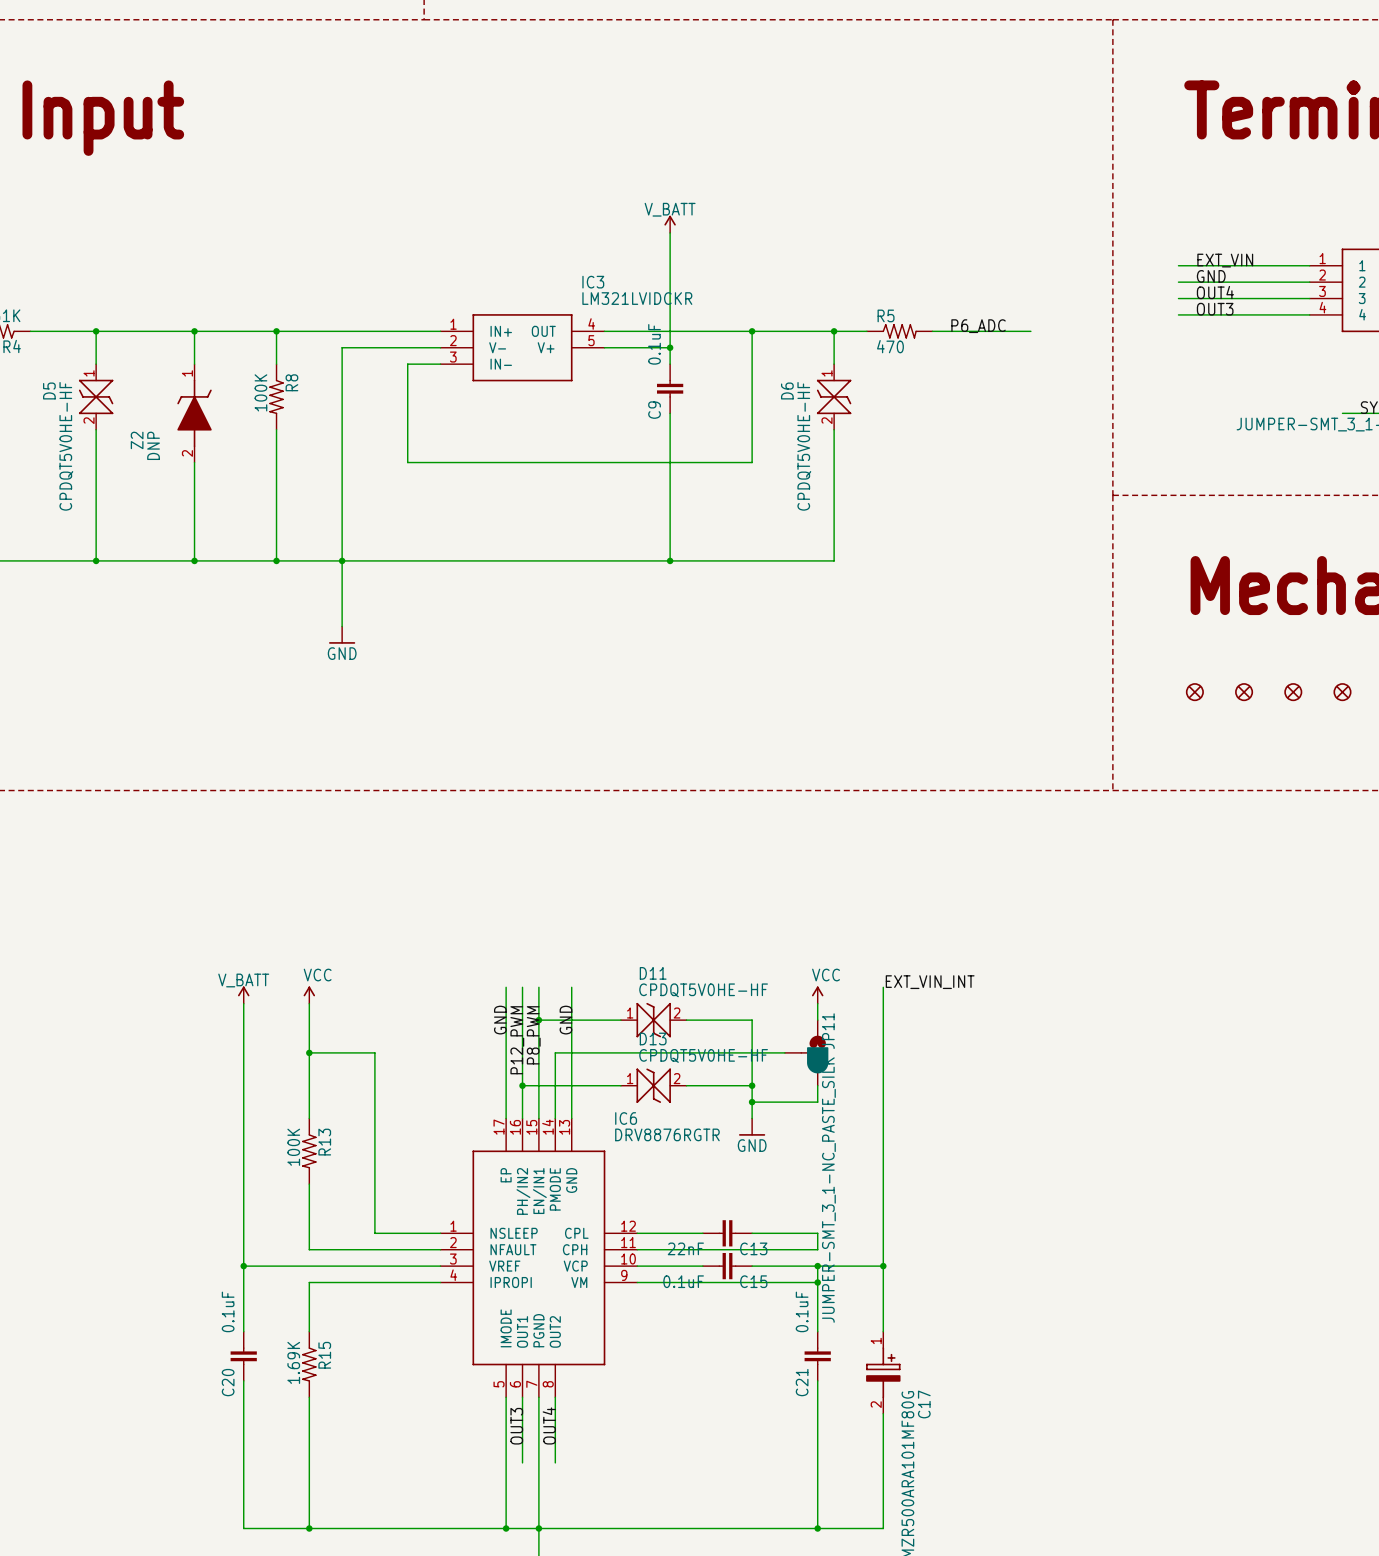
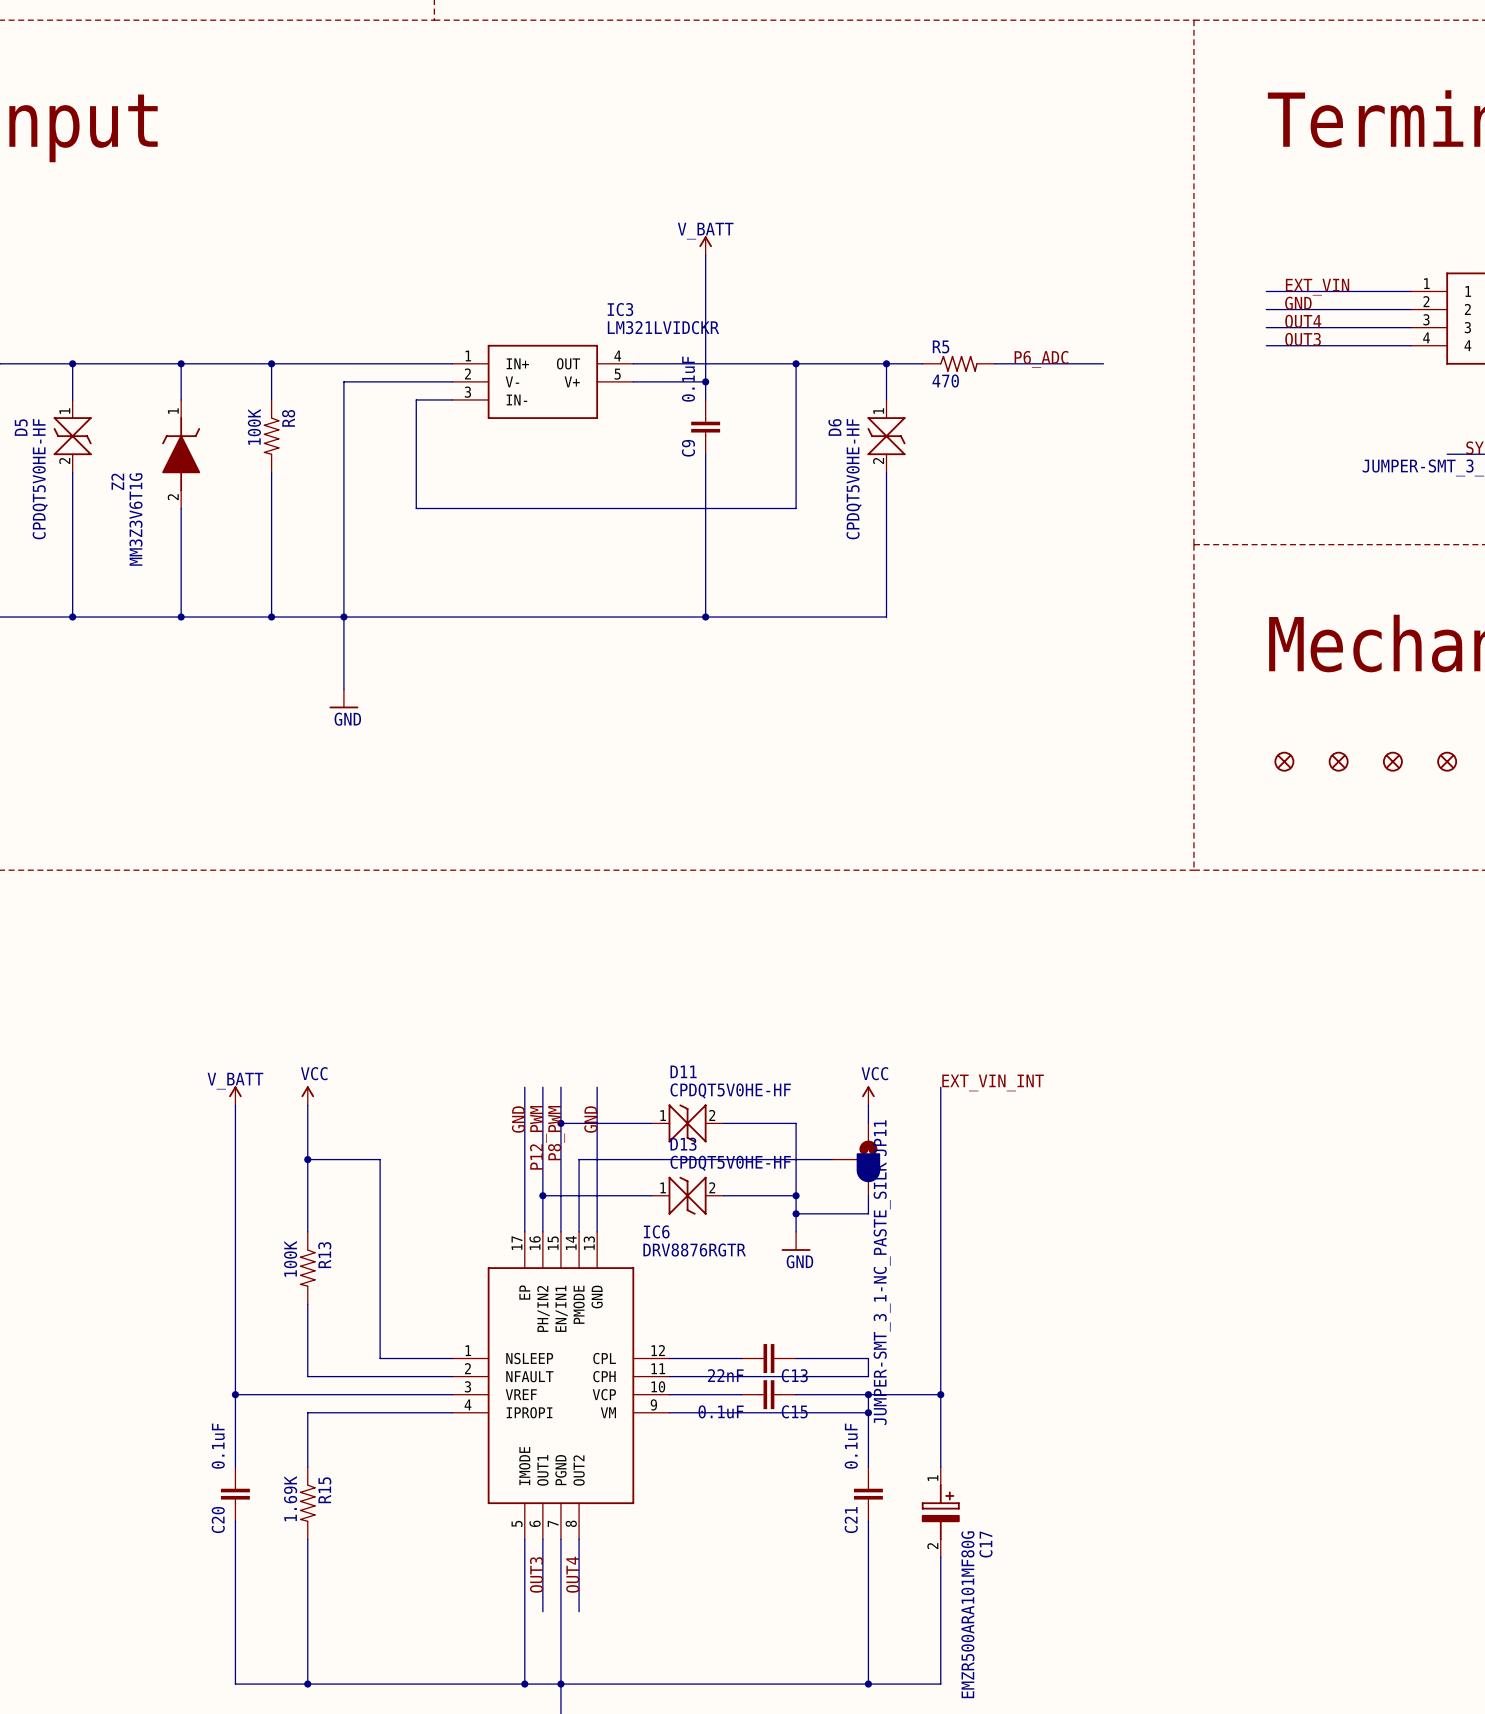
Z2 value: DNP (153, 445) -> MM3Z3V6T1G (135, 519)

